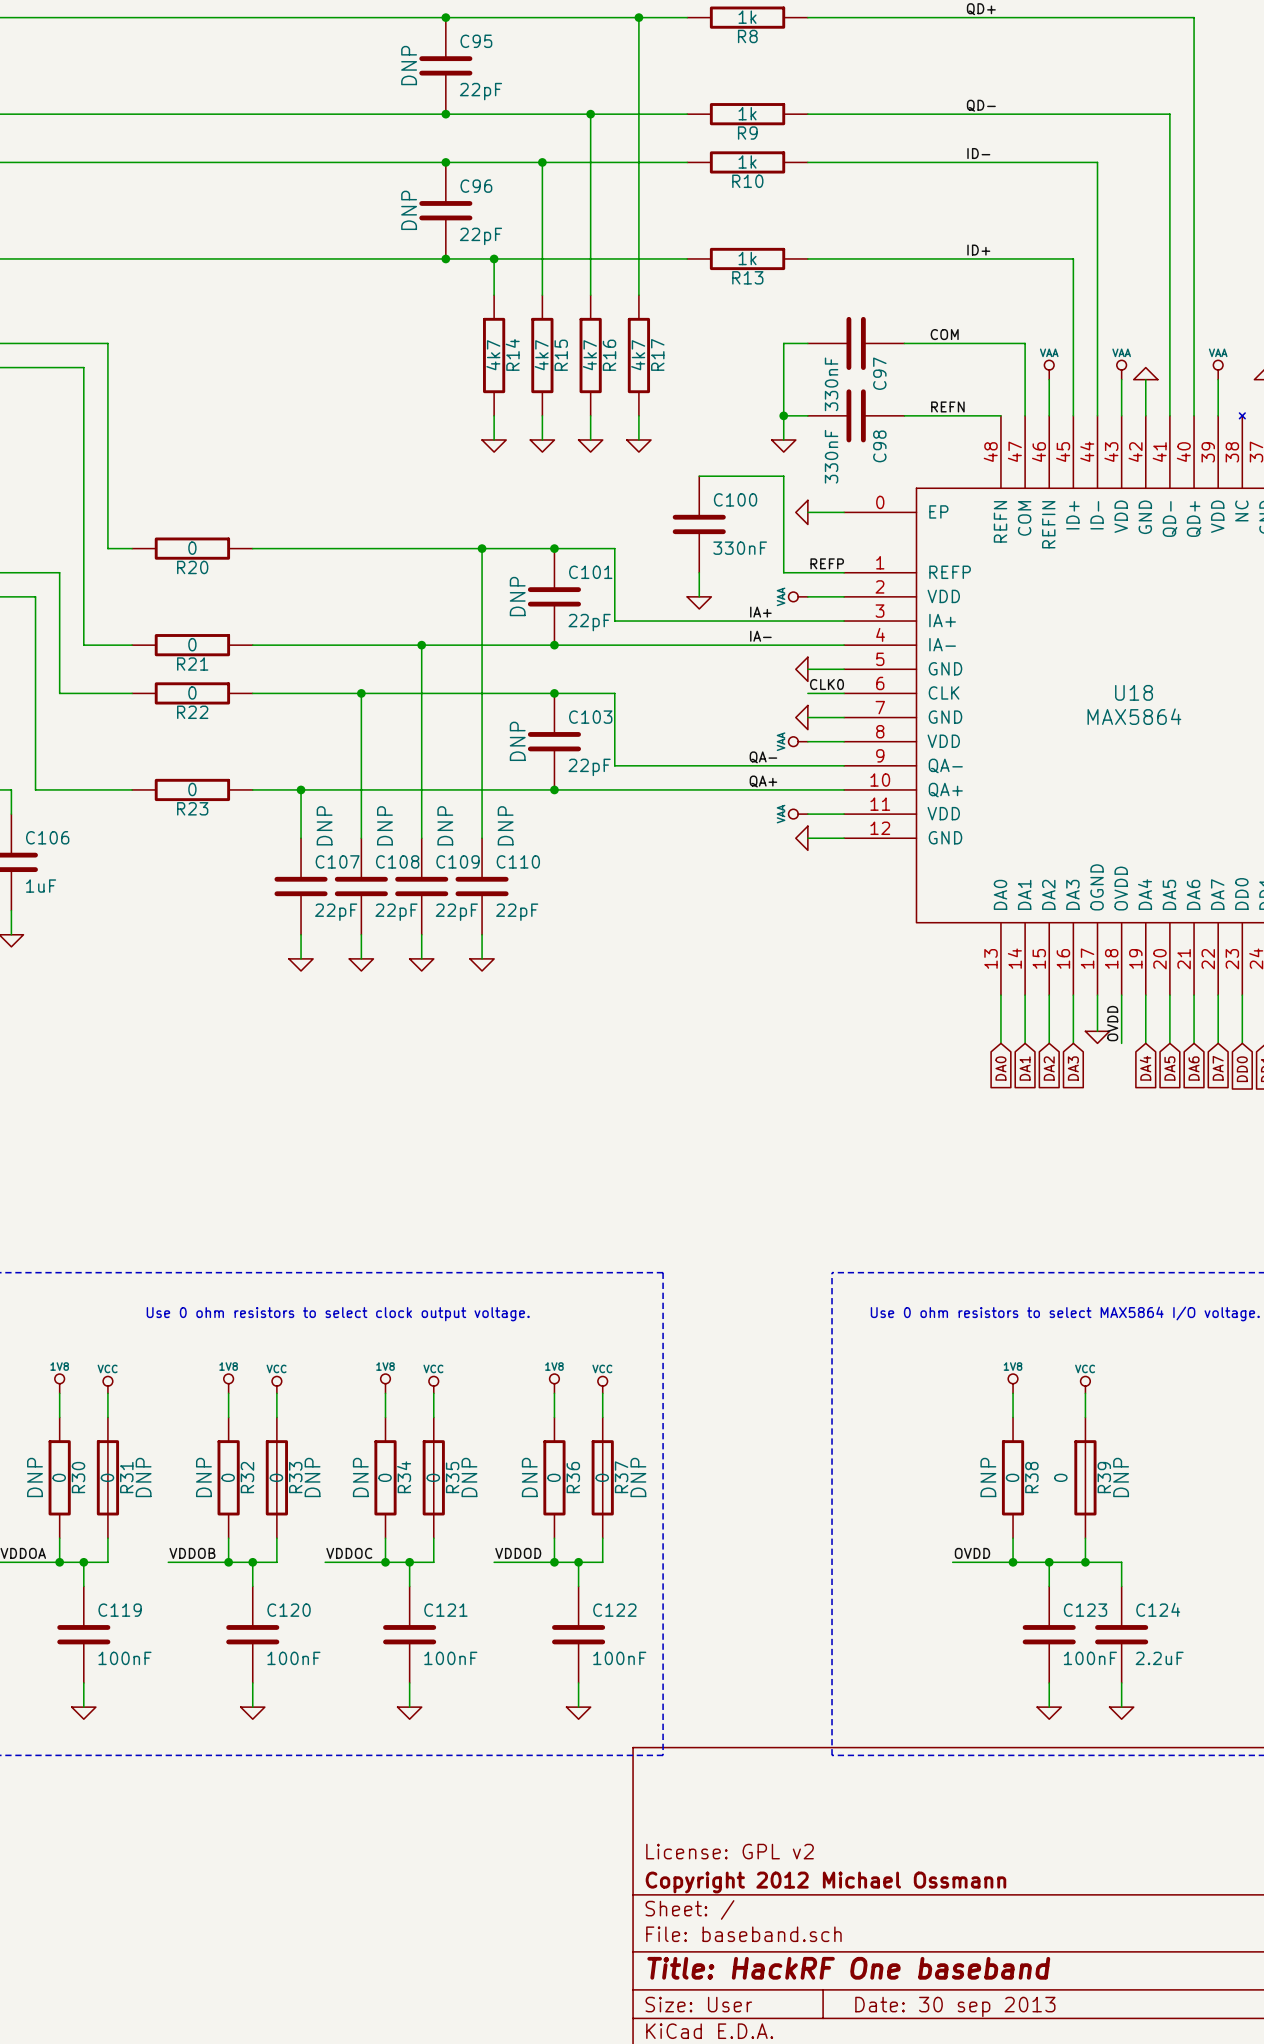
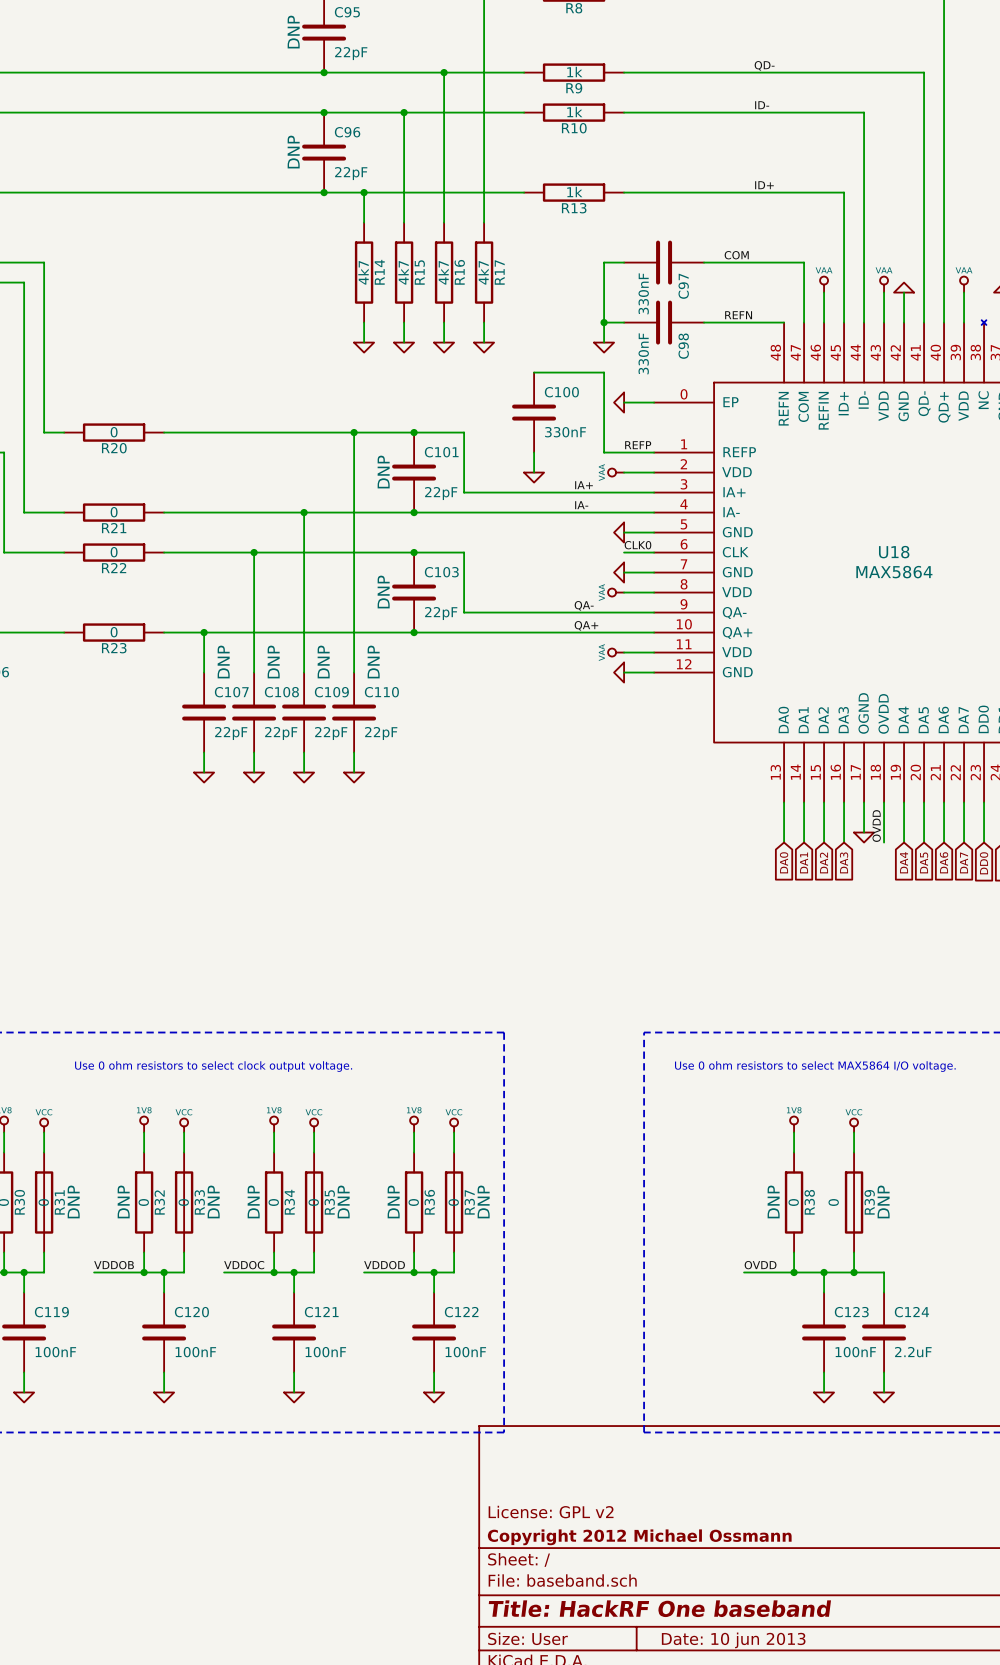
title block: Date: 30 sep 2013 (955, 2006) -> Date: 10 jun 2013 (733, 1640)

